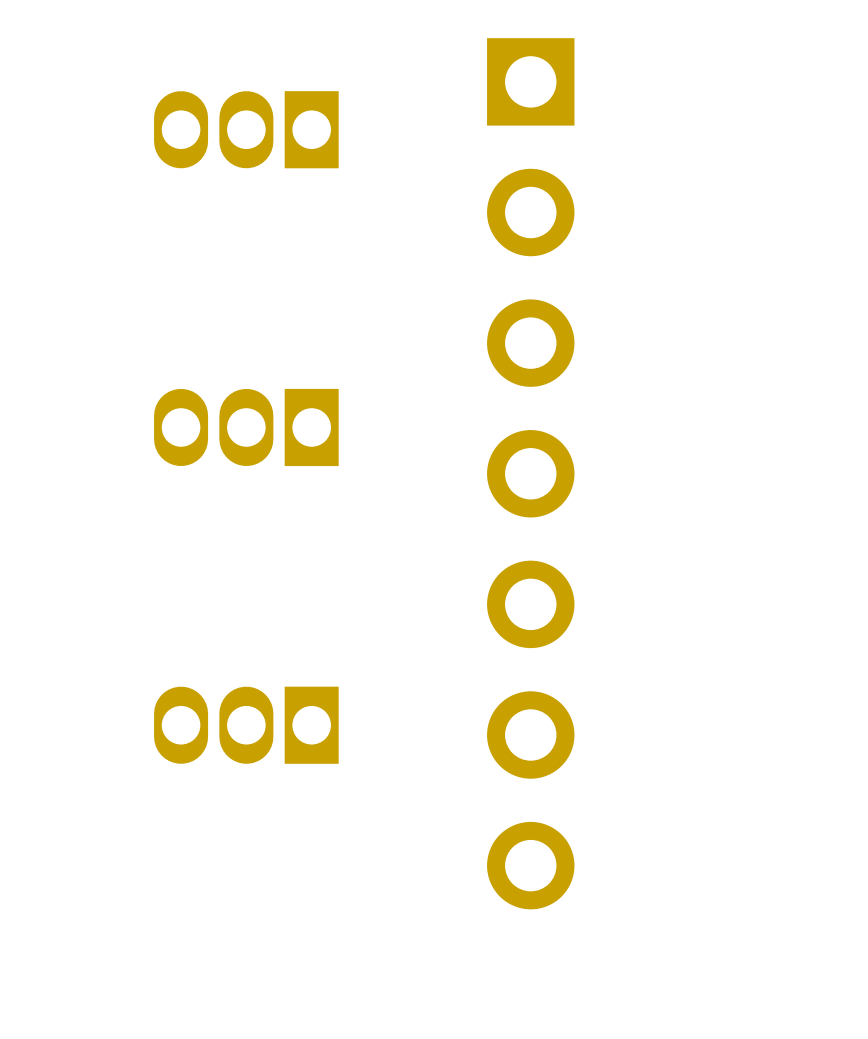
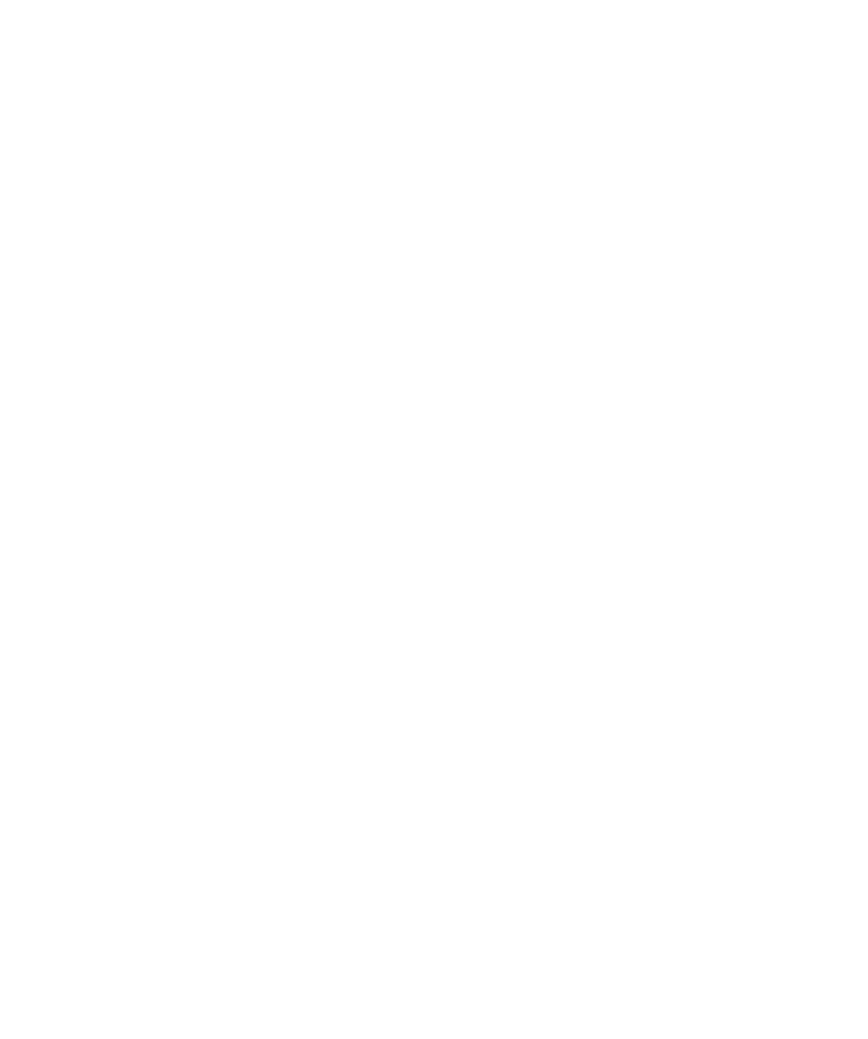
part: (246, 129) -> none
part: (246, 427) -> none
part: (530, 473) -> none
part: (246, 725) -> none

